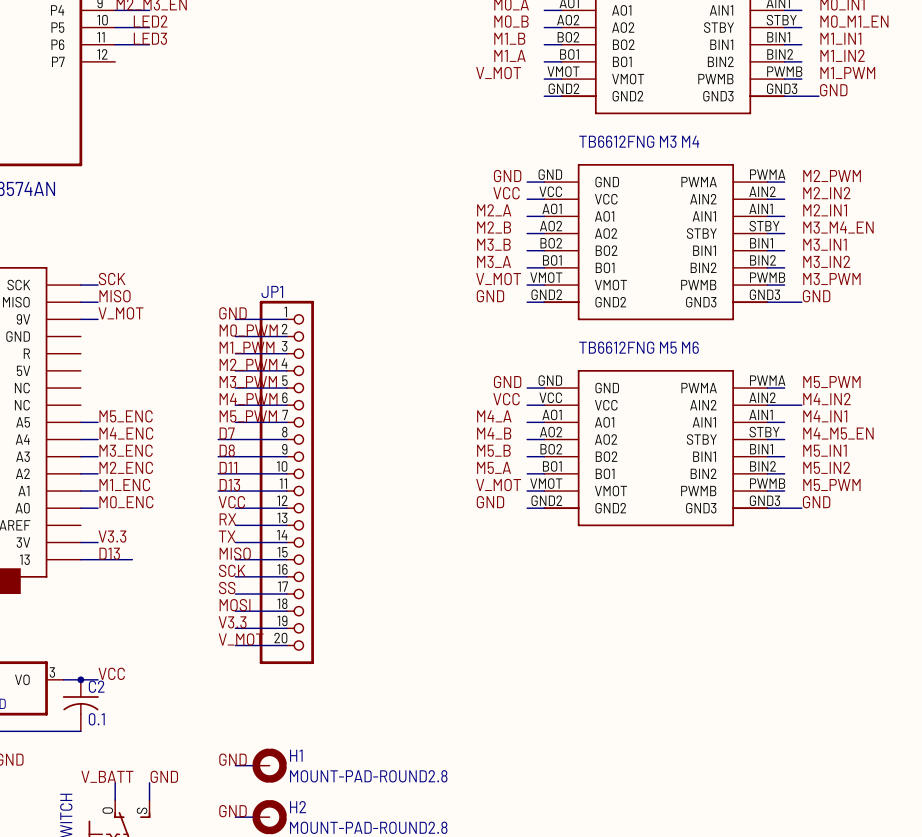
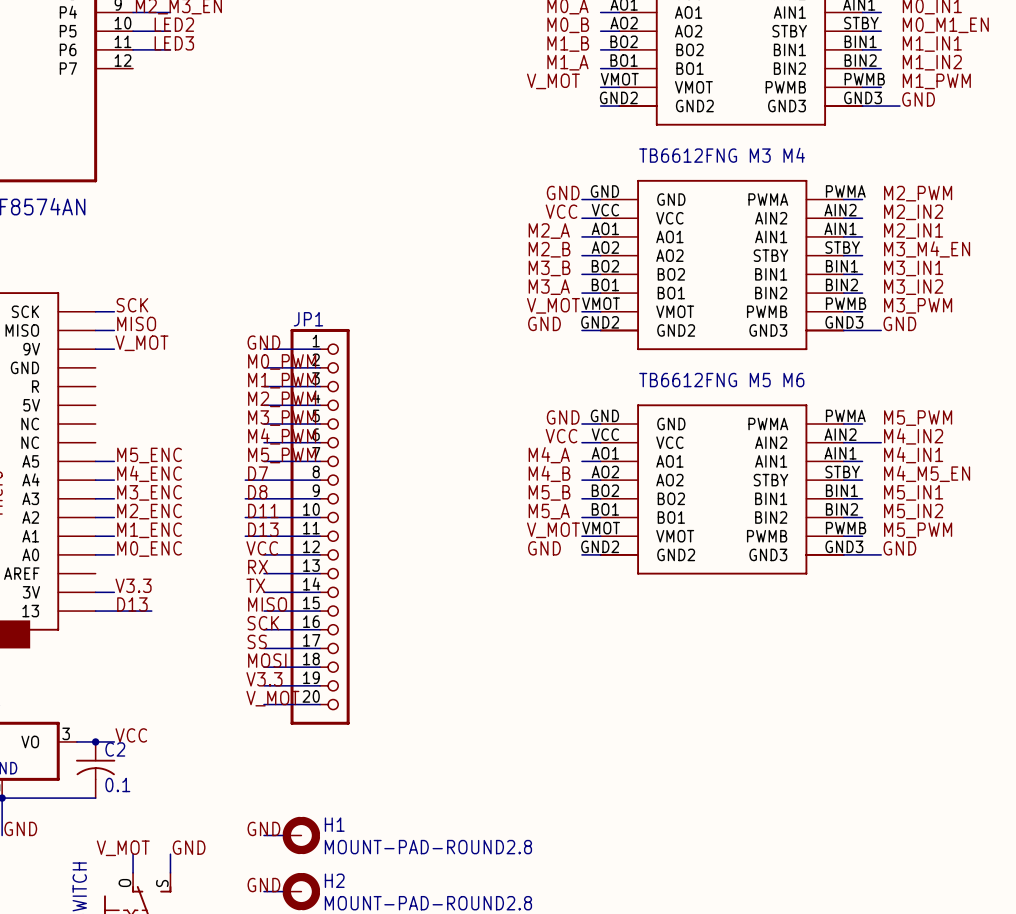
label: V_BATT (107, 776) -> V_MOT (123, 848)

